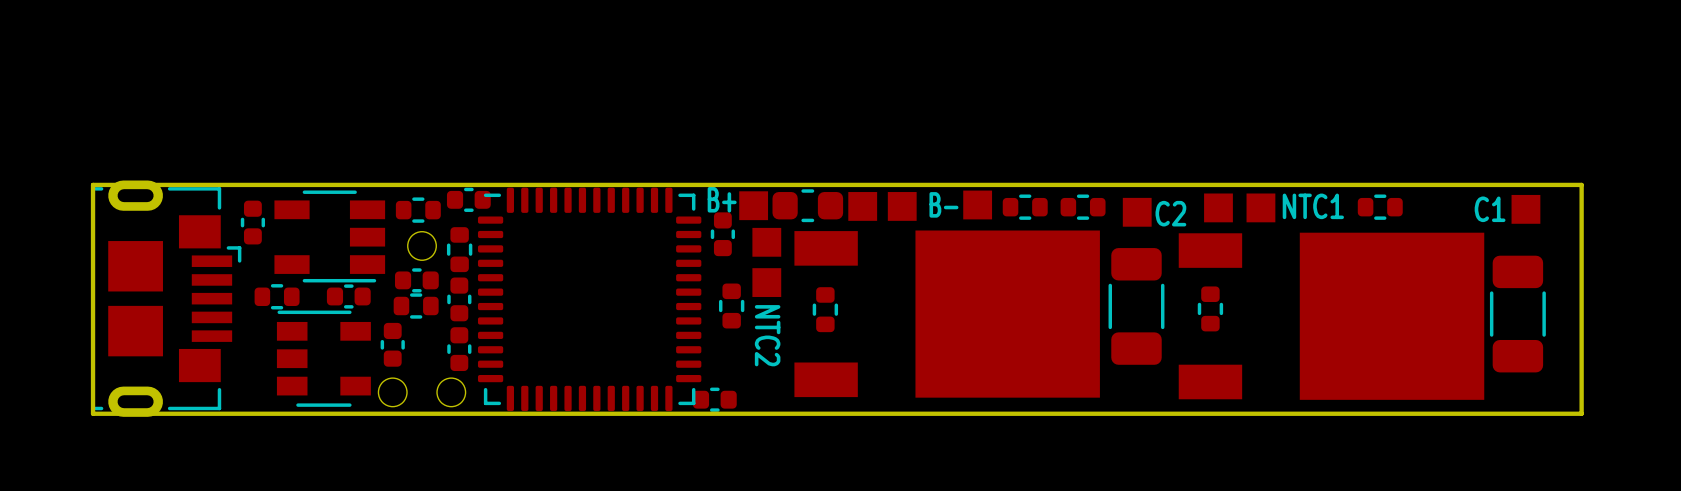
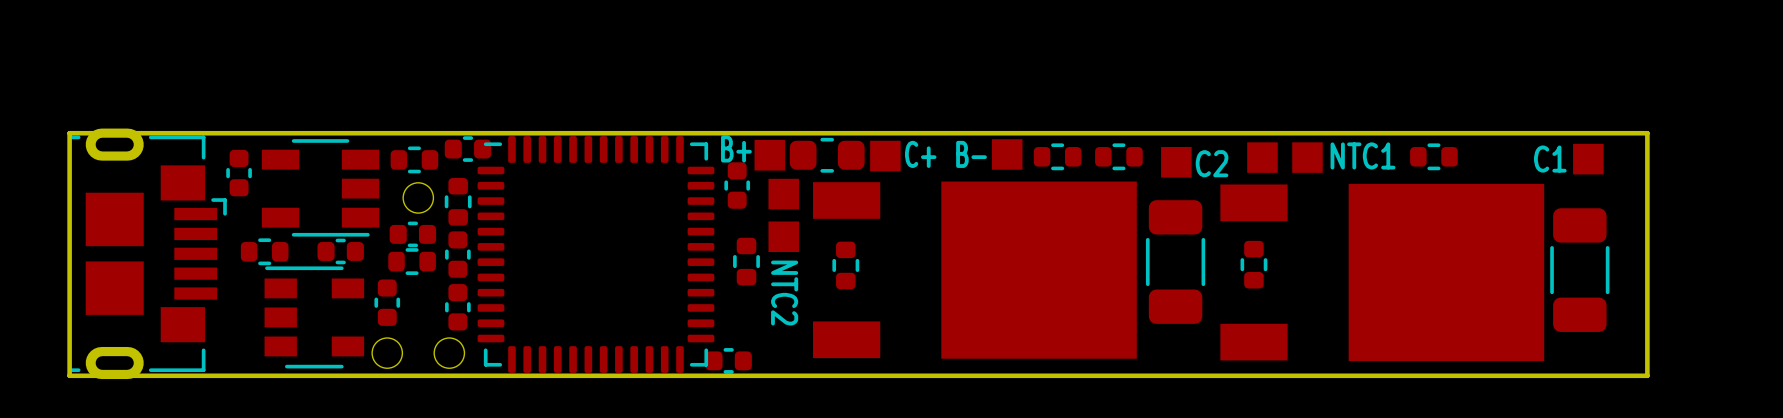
text: none -> C+ (920, 154)
part: (902, 206) -> none

